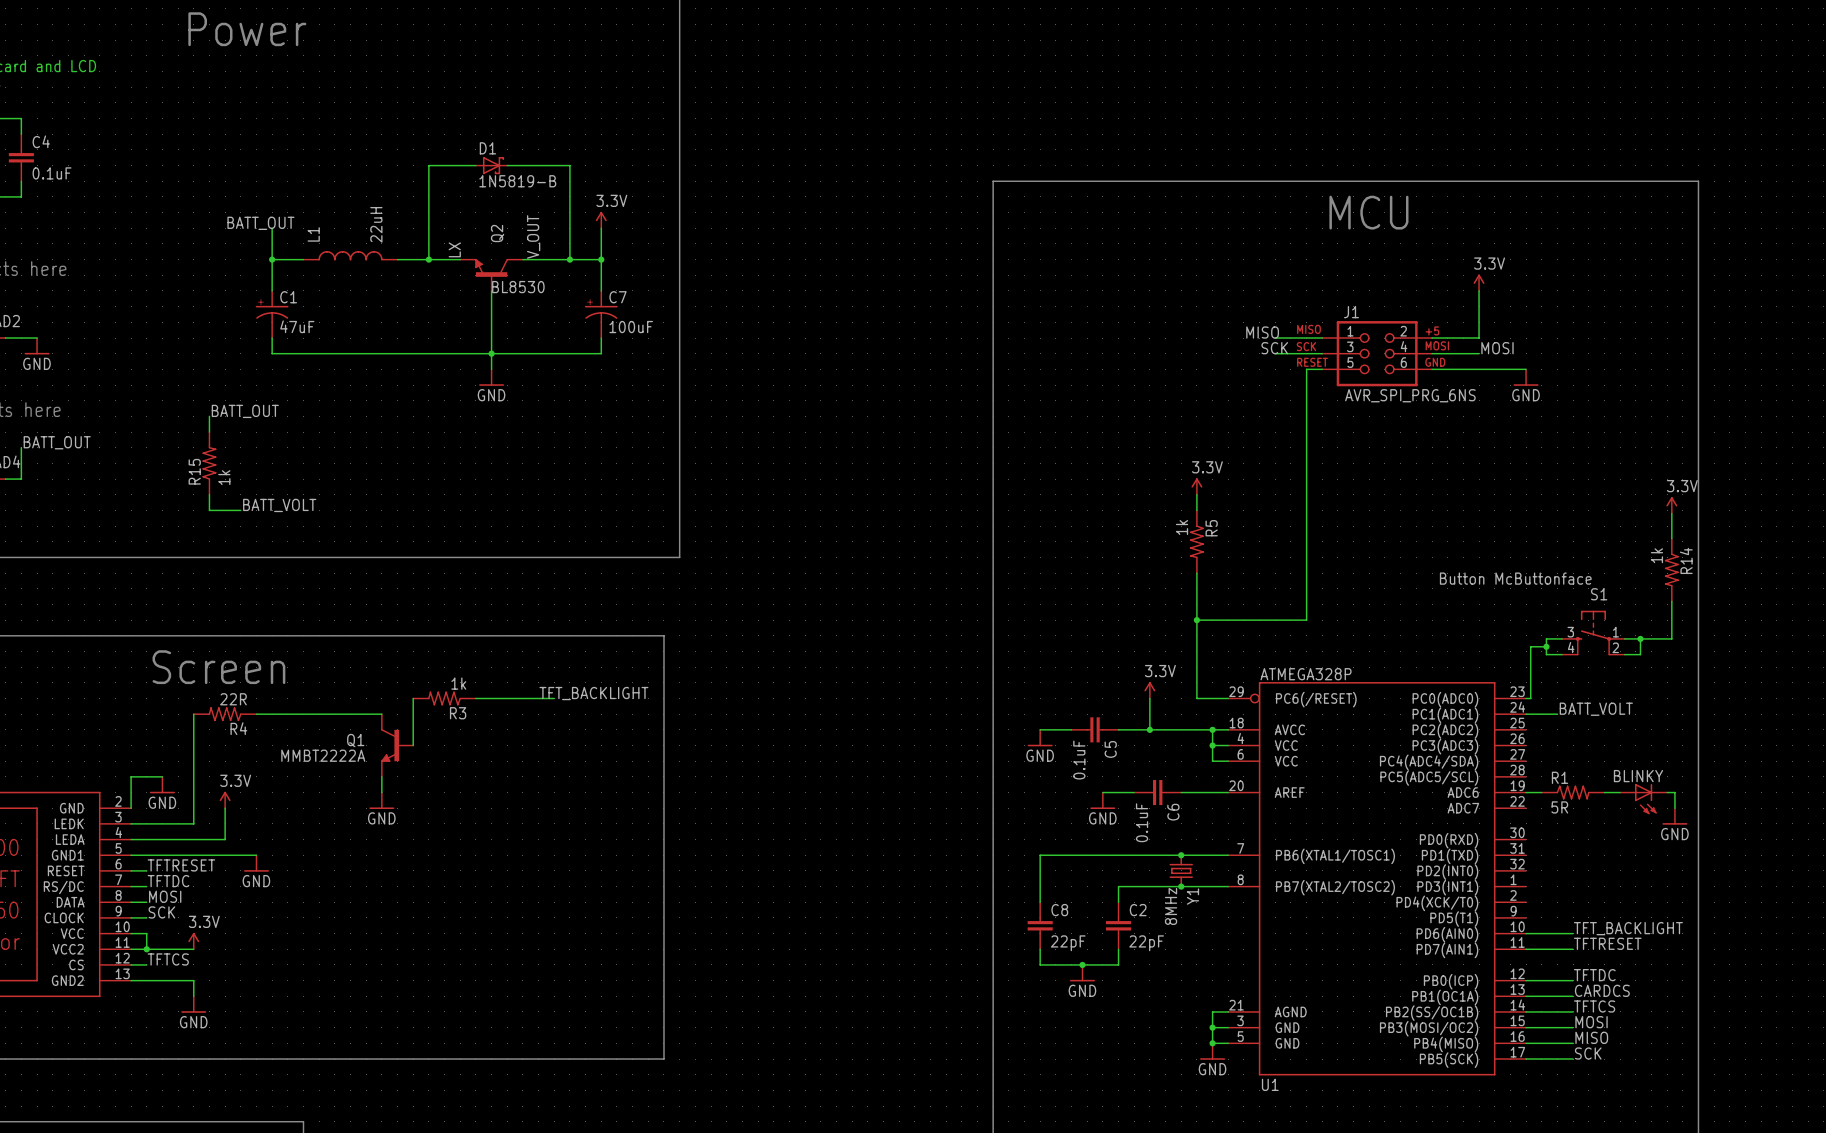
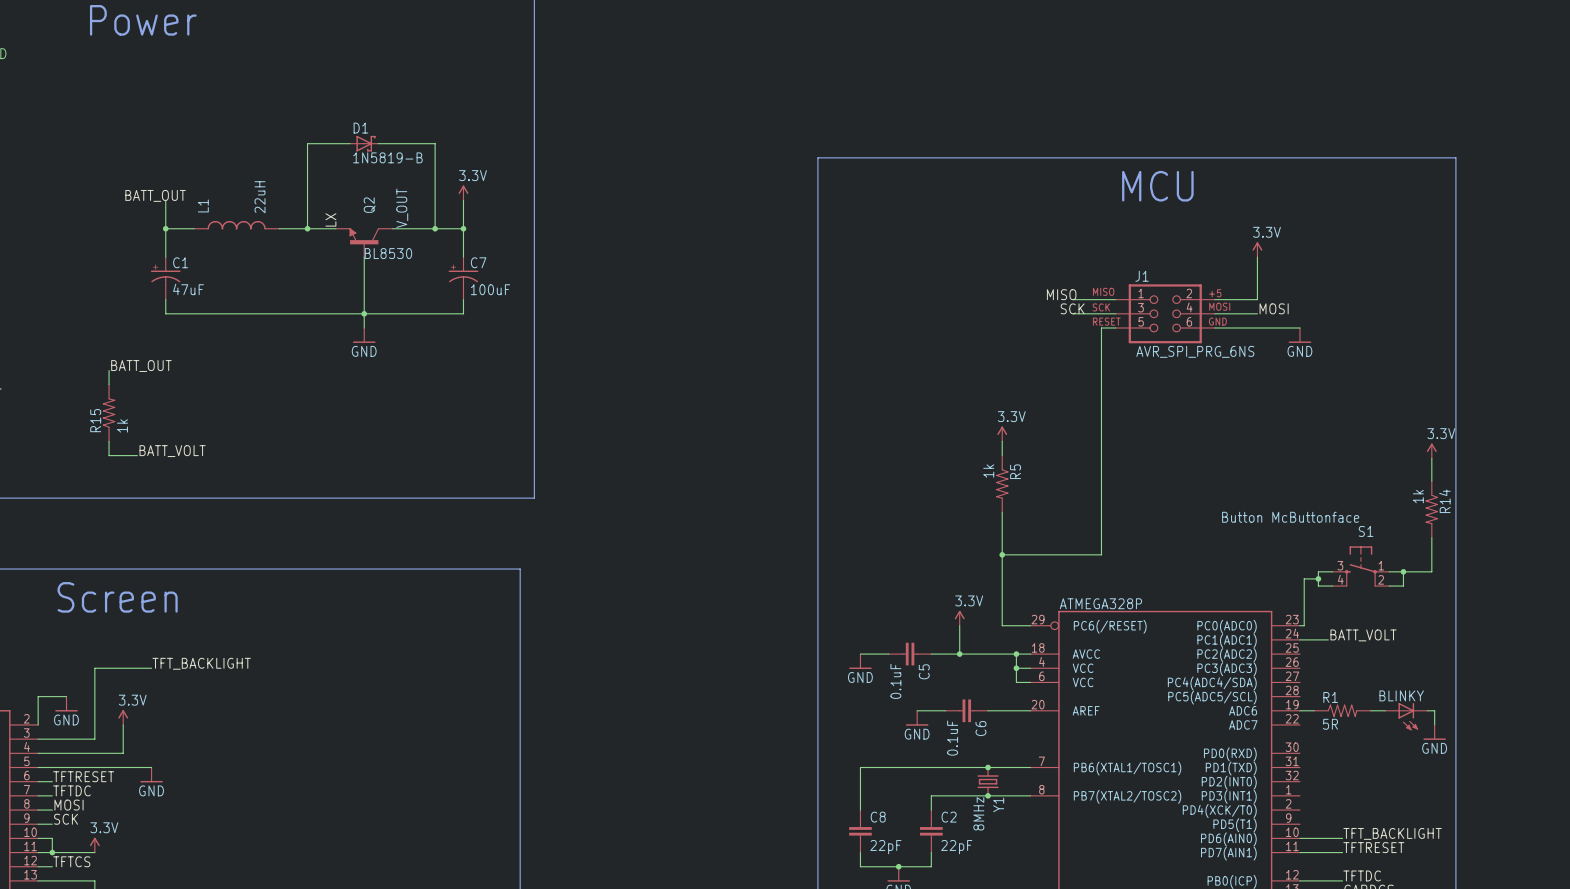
label: TFT_BACKLIGHT (593, 693) -> none
wire: (413, 698) (413, 745) -> none
R3: 1k (444, 698) -> none
wire: (475, 698) (554, 698) -> none
wire: (193, 714) (193, 745) -> (151, 668) (94, 668)
R4: 22R (225, 714) -> none
wire: (256, 714) (381, 714) -> none
label: none -> TFT_BACKLIGHT (201, 663)
Q1: MMBT2222A (397, 745) -> none
wire: (381, 776) (381, 792) -> none
power symbol: GND (381, 800) -> none

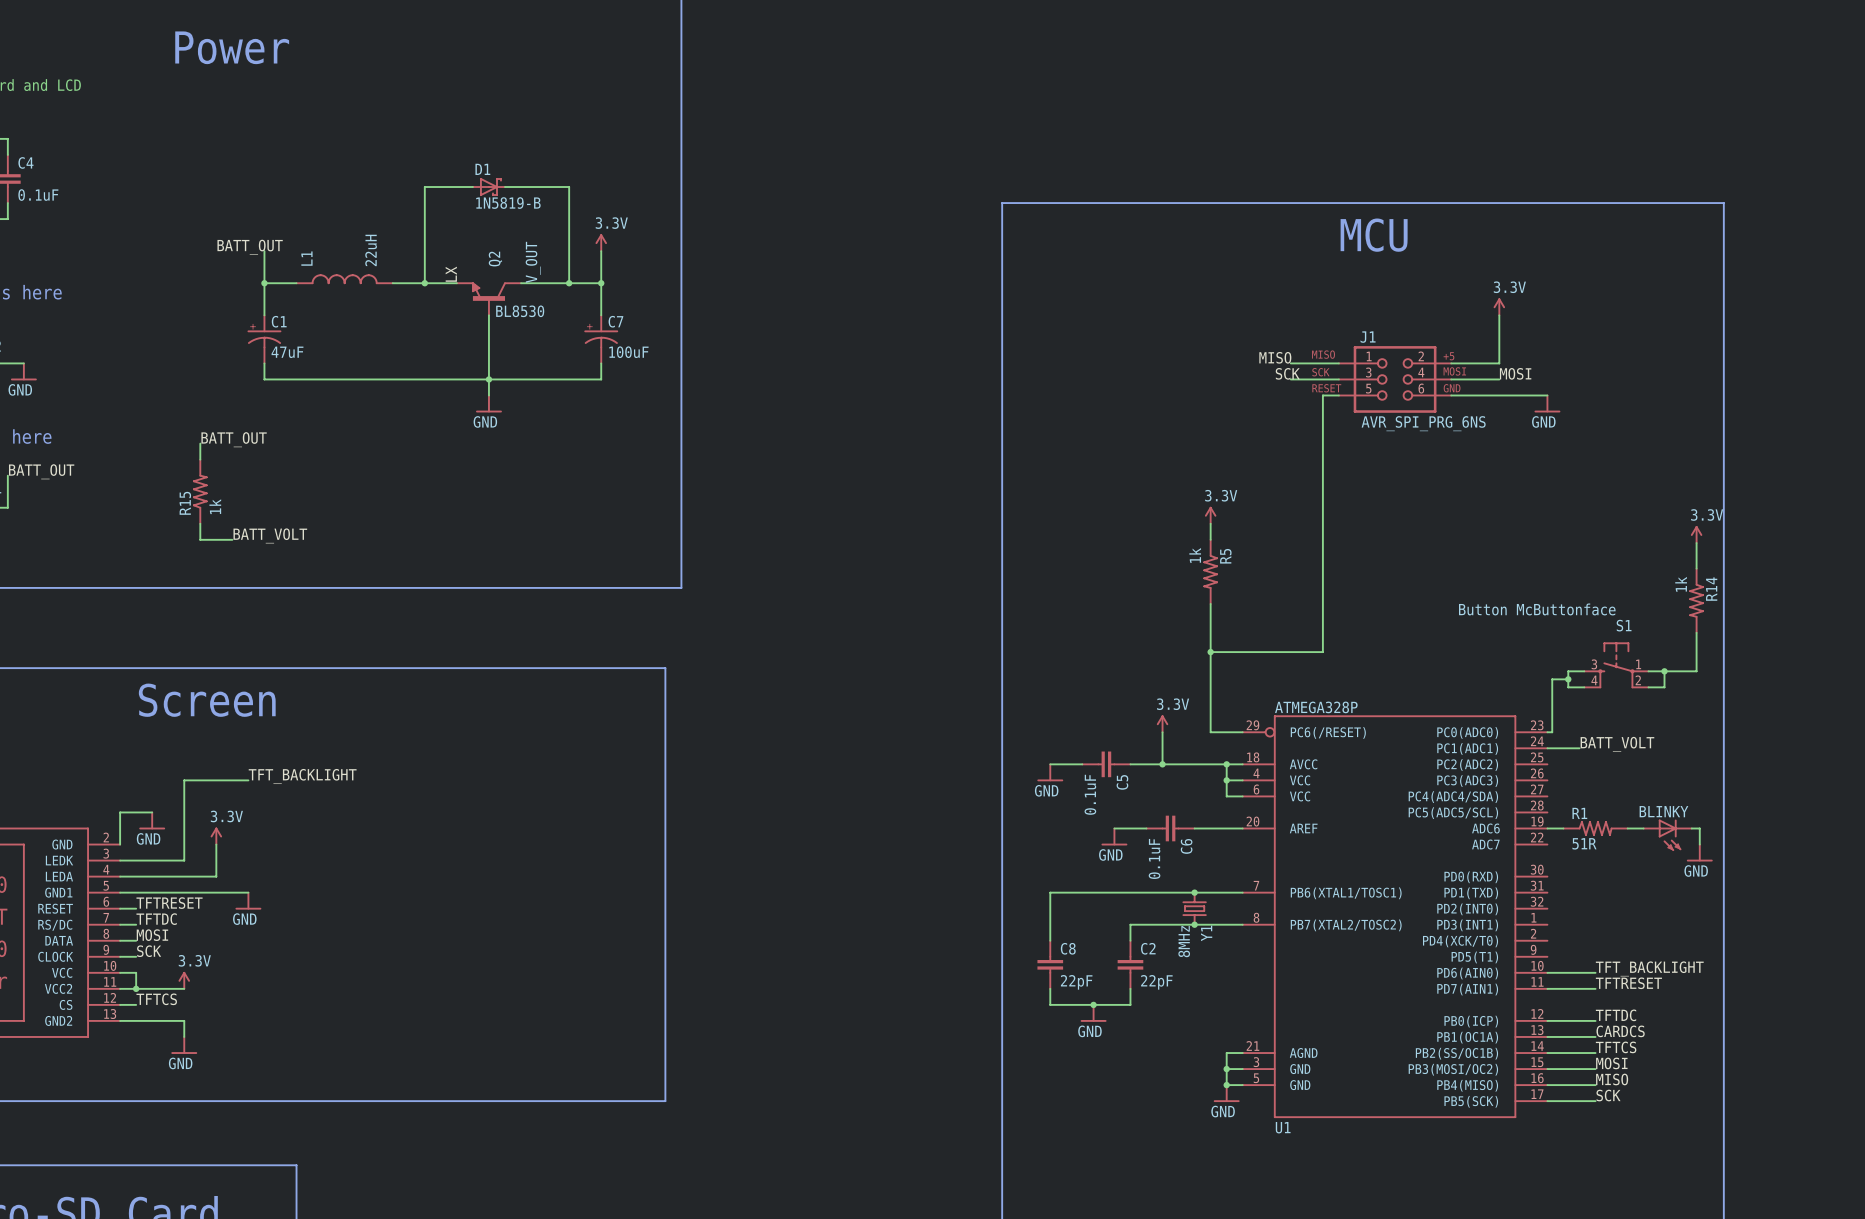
R1 value: 5R (1330, 724) -> 51R (1584, 843)

